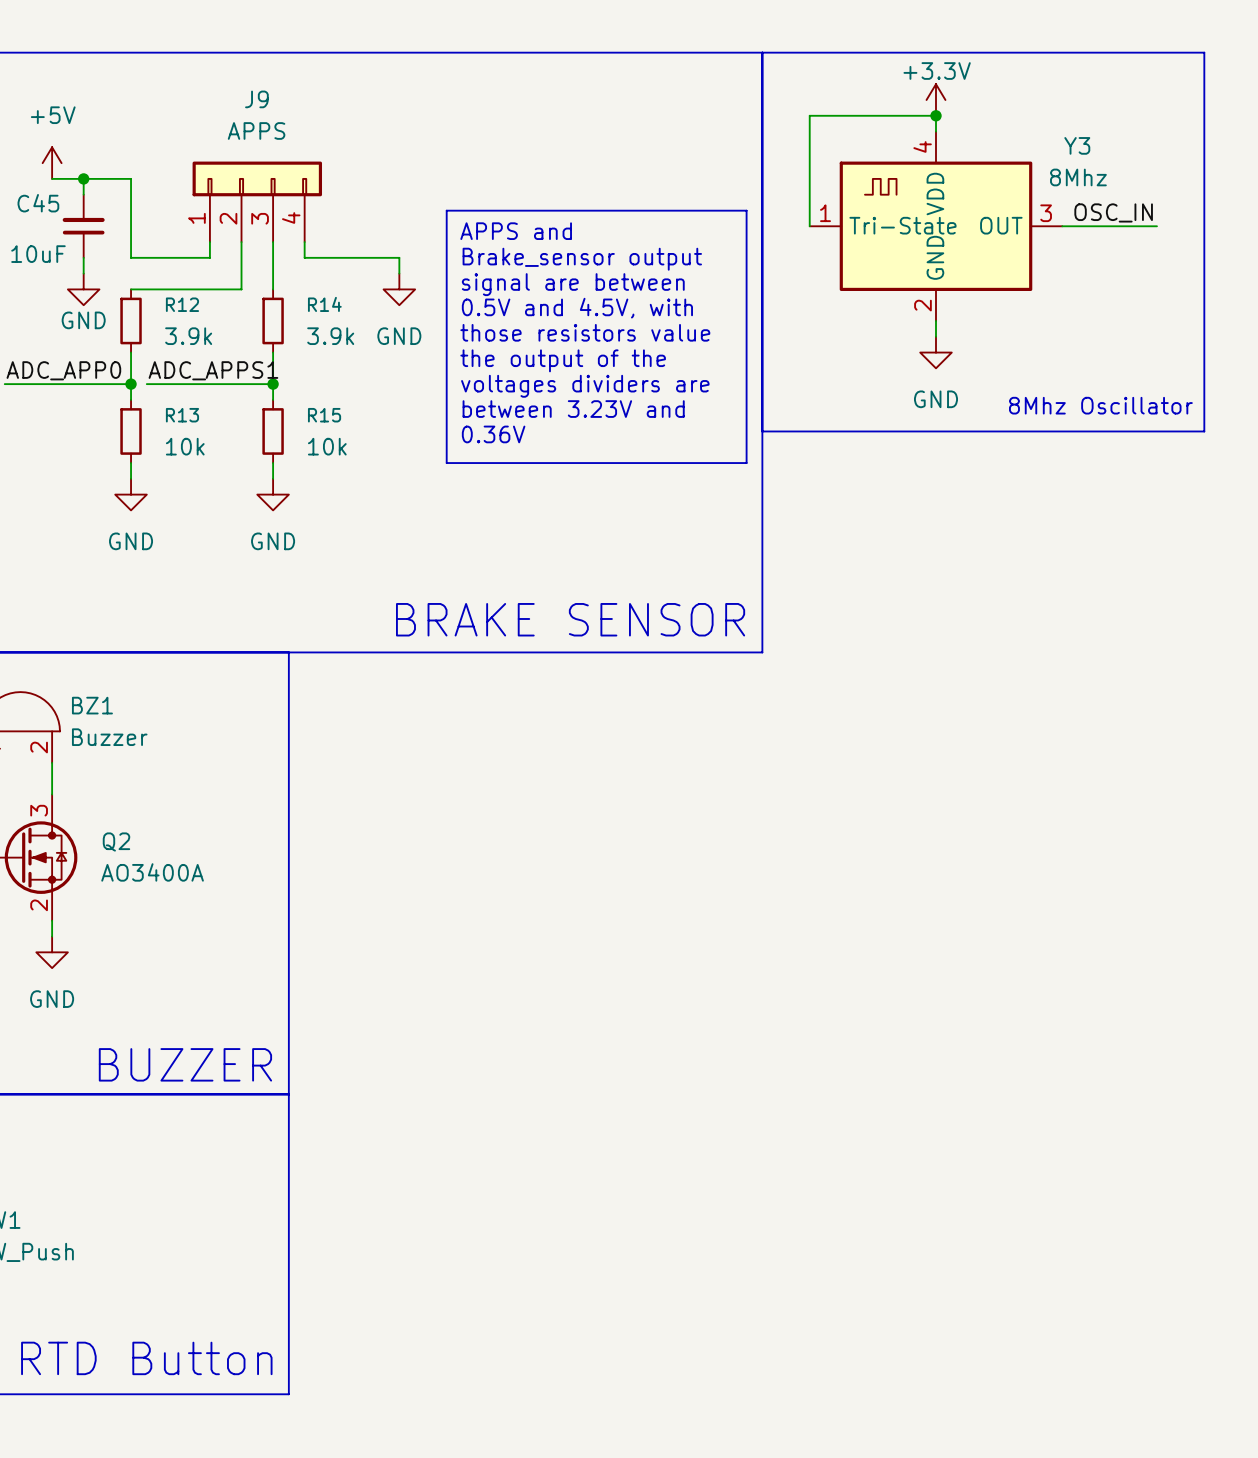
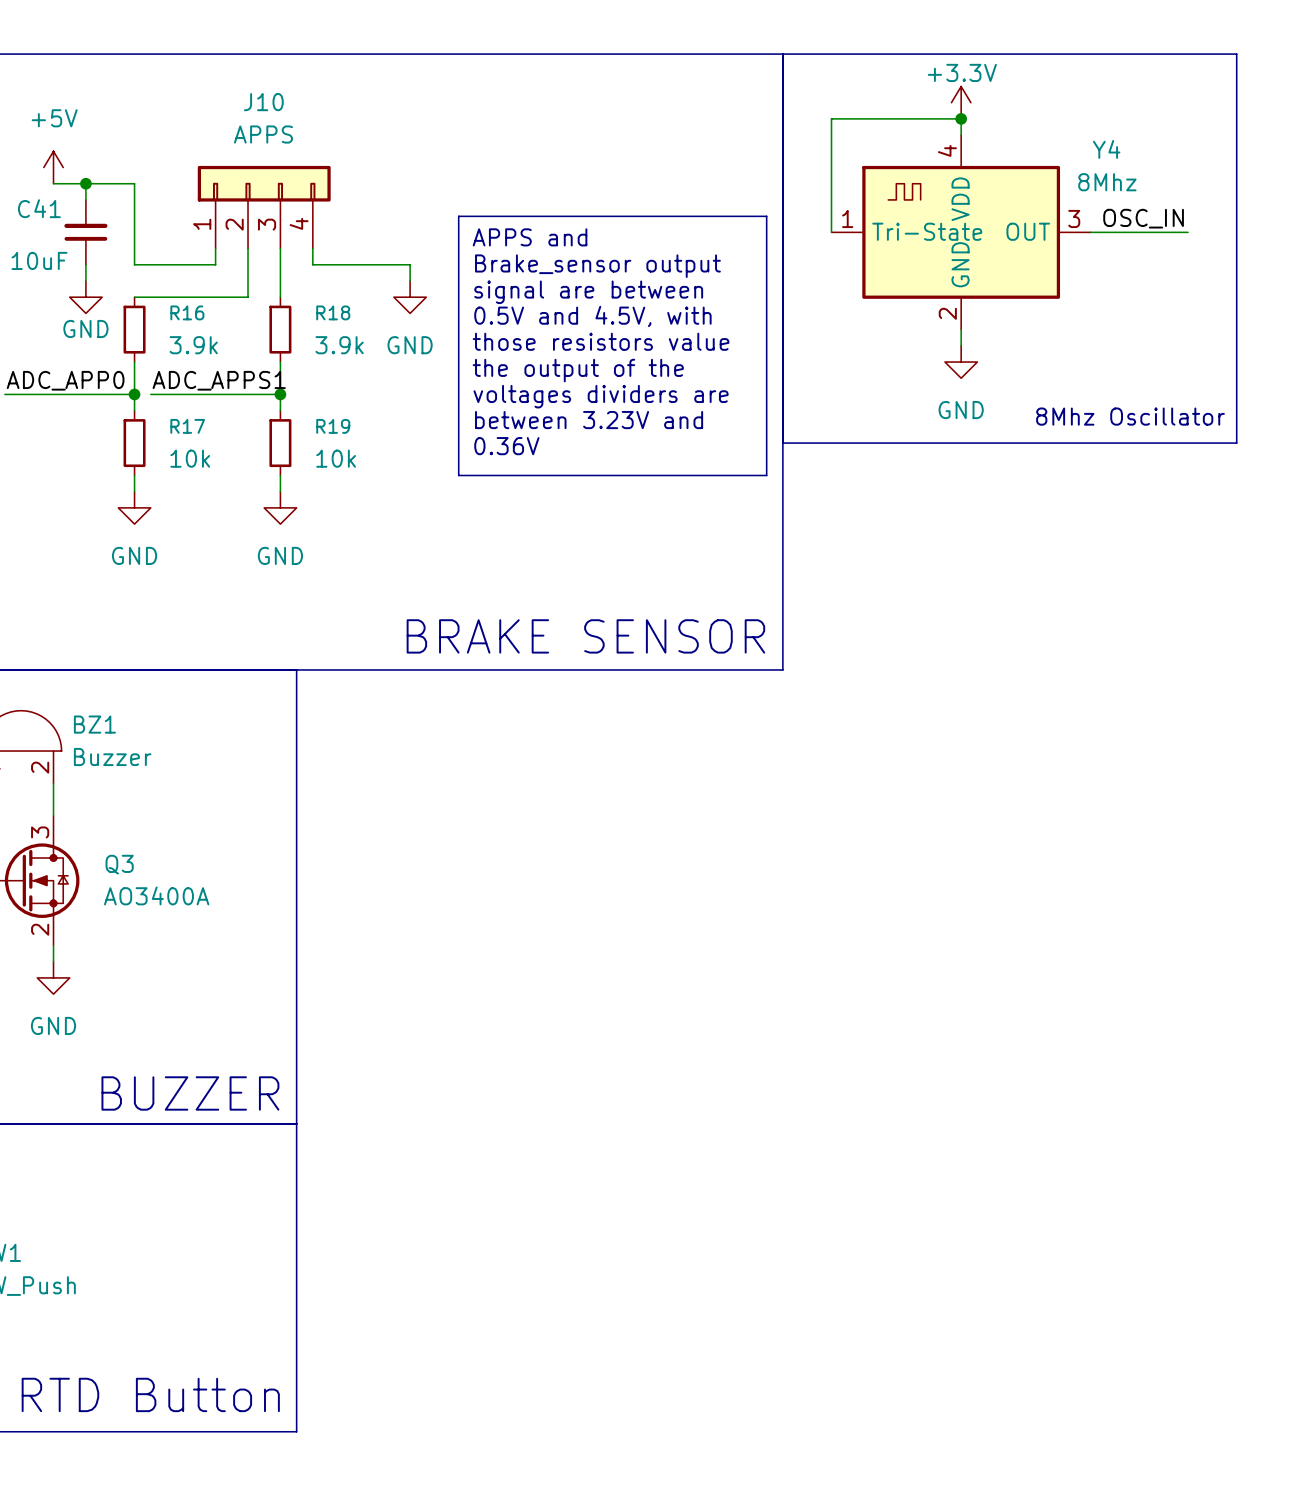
J9 name: J9 (256, 99) -> J10 (263, 102)
Y3 name: Y3 (1077, 145) -> Y4 (1106, 149)
C45 name: C45 (38, 203) -> C41 (39, 208)
R12 name: R12 (182, 304) -> R16 (187, 312)
R14 name: R14 (324, 304) -> R18 (333, 312)
R13 name: R13 (182, 415) -> R17 (187, 426)
R15 name: R15 (324, 415) -> R19 (333, 426)
Q2 name: Q2 (116, 842) -> Q3 (119, 864)

